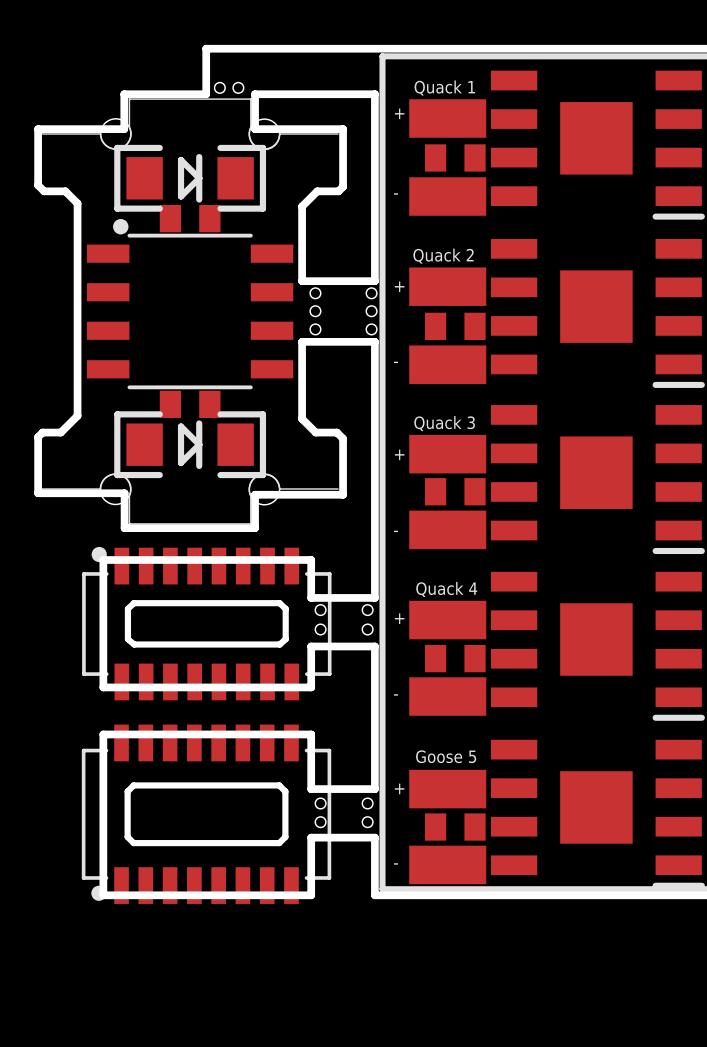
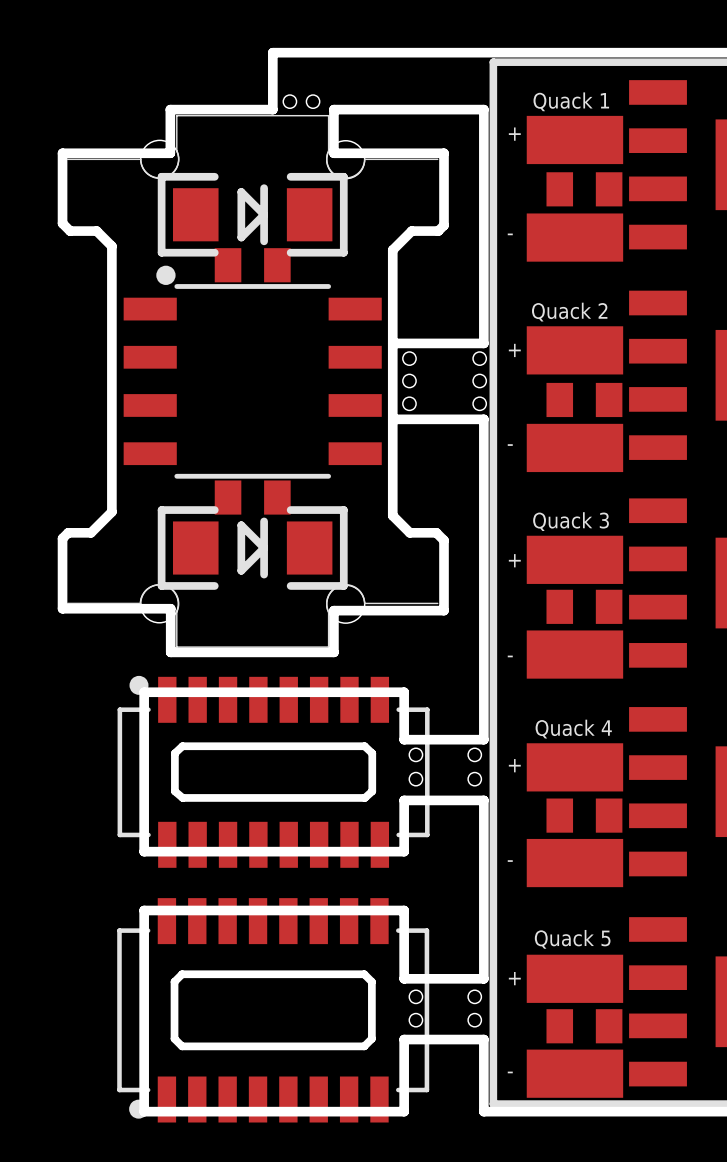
board edge: none -> (392, 343) (392, 419)
text: Goose 5 (446, 756) -> Quack 5 (572, 939)

